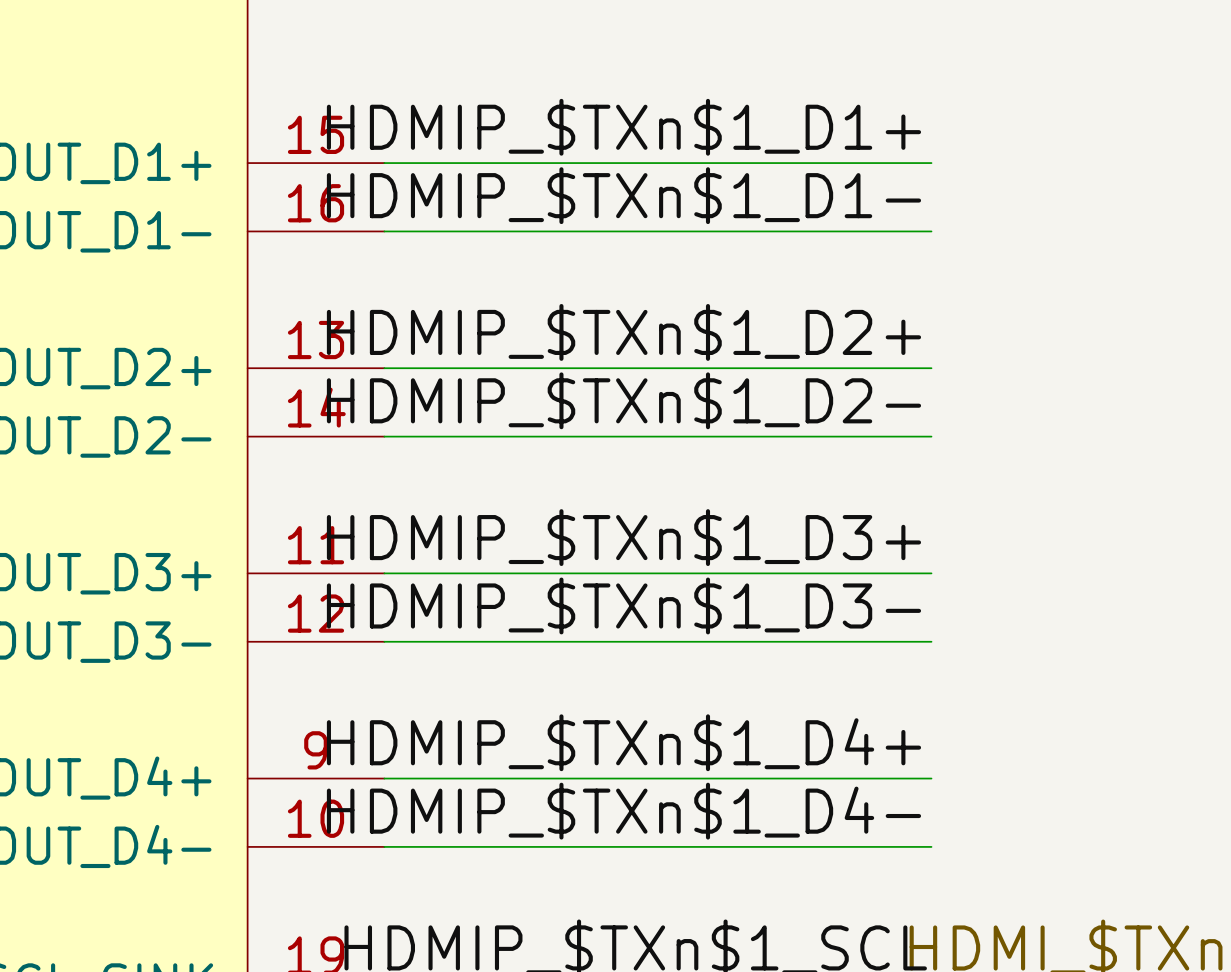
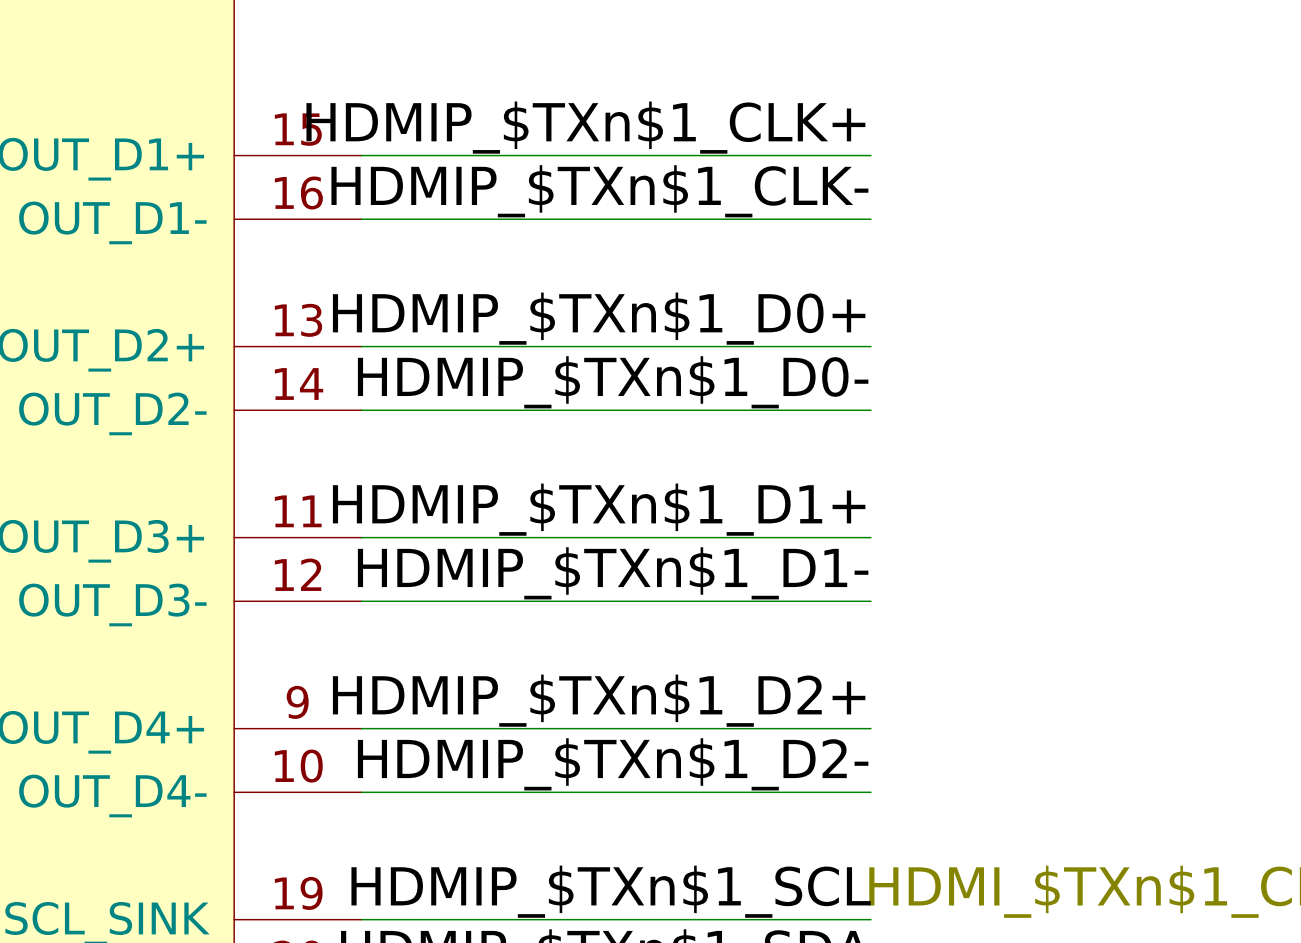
label: HDMIP_$TXn$1_D1+ (623, 127) -> HDMIP_$TXn$1_CLK+ (585, 127)
label: HDMIP_$TXn$1_D1- (623, 195) -> HDMIP_$TXn$1_CLK- (599, 191)
label: HDMIP_$TXn$1_D2+ (623, 332) -> HDMIP_$TXn$1_D0+ (599, 318)
label: HDMIP_$TXn$1_D2- (623, 400) -> HDMIP_$TXn$1_D0- (613, 382)
label: HDMIP_$TXn$1_D3+ (623, 537) -> HDMIP_$TXn$1_D1+ (599, 509)
label: HDMIP_$TXn$1_D3- (623, 605) -> HDMIP_$TXn$1_D1- (613, 573)
label: HDMIP_$TXn$1_D4+ (623, 742) -> HDMIP_$TXn$1_D2+ (599, 700)
label: HDMIP_$TXn$1_D4- (623, 811) -> HDMIP_$TXn$1_D2- (613, 764)

